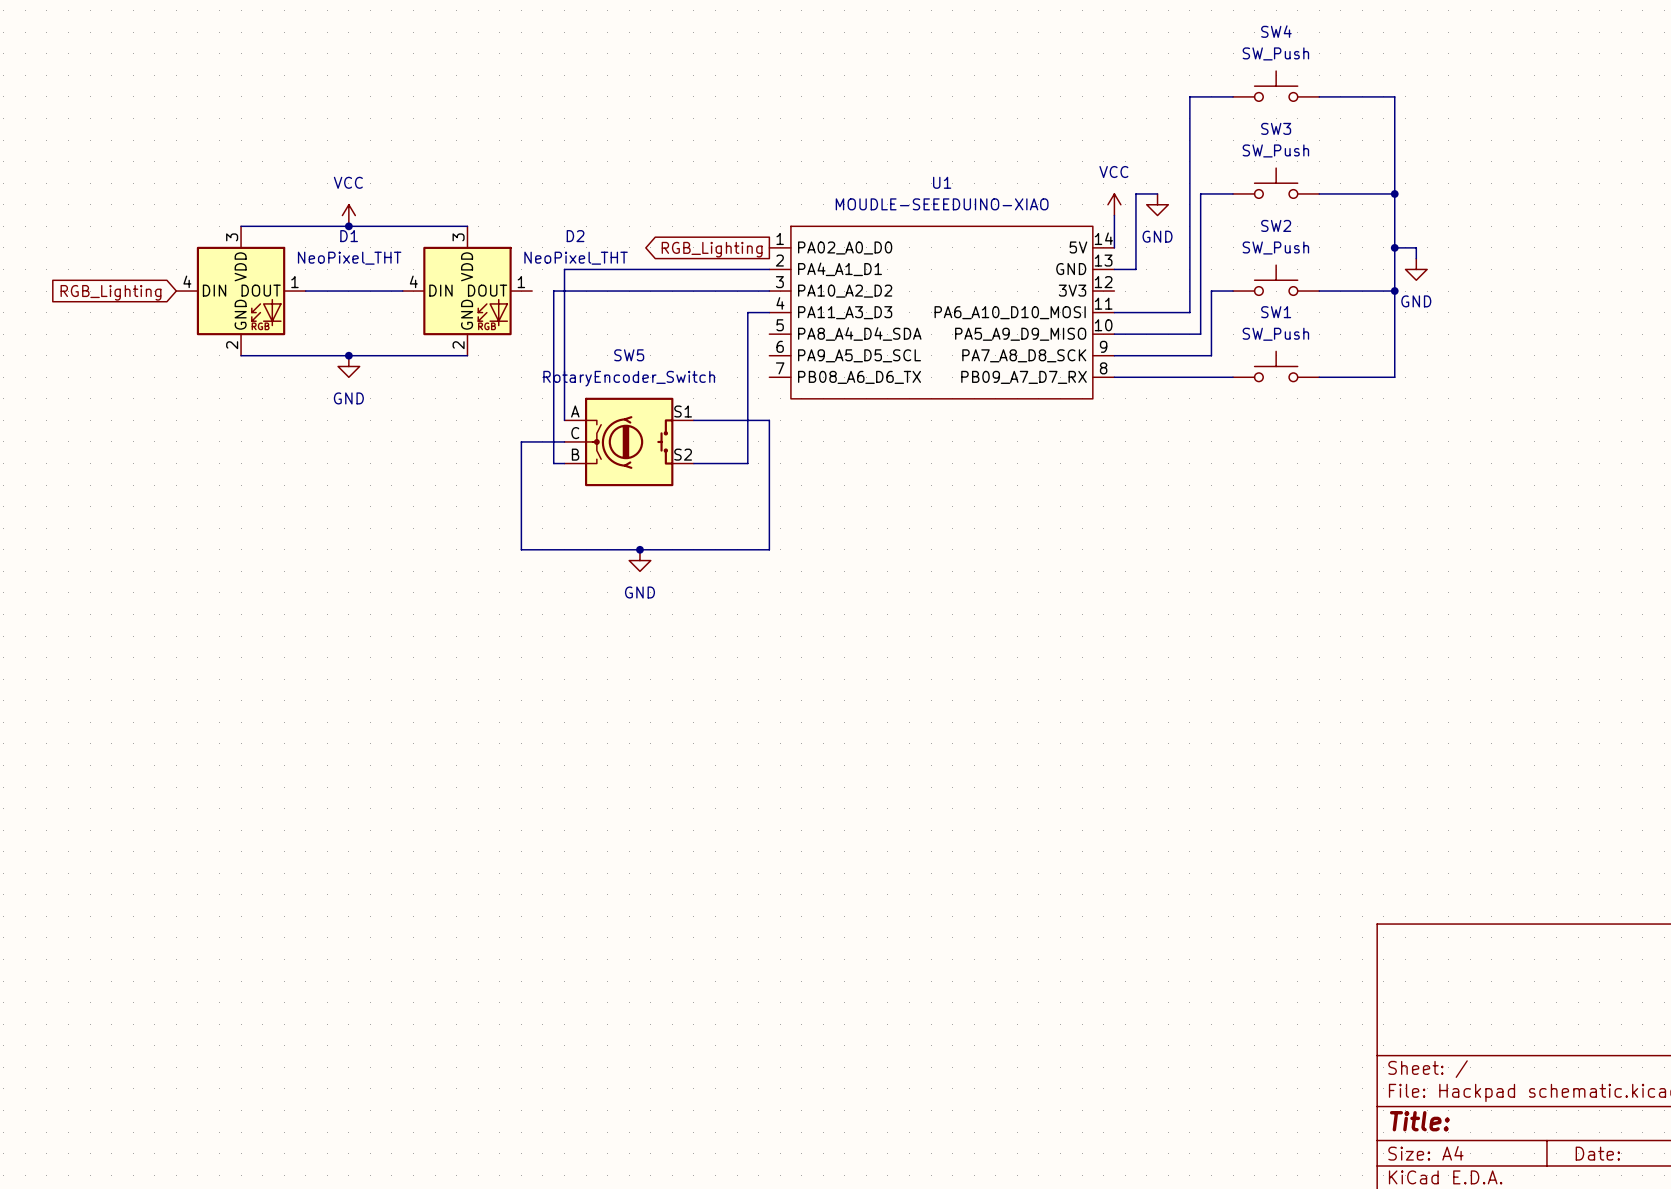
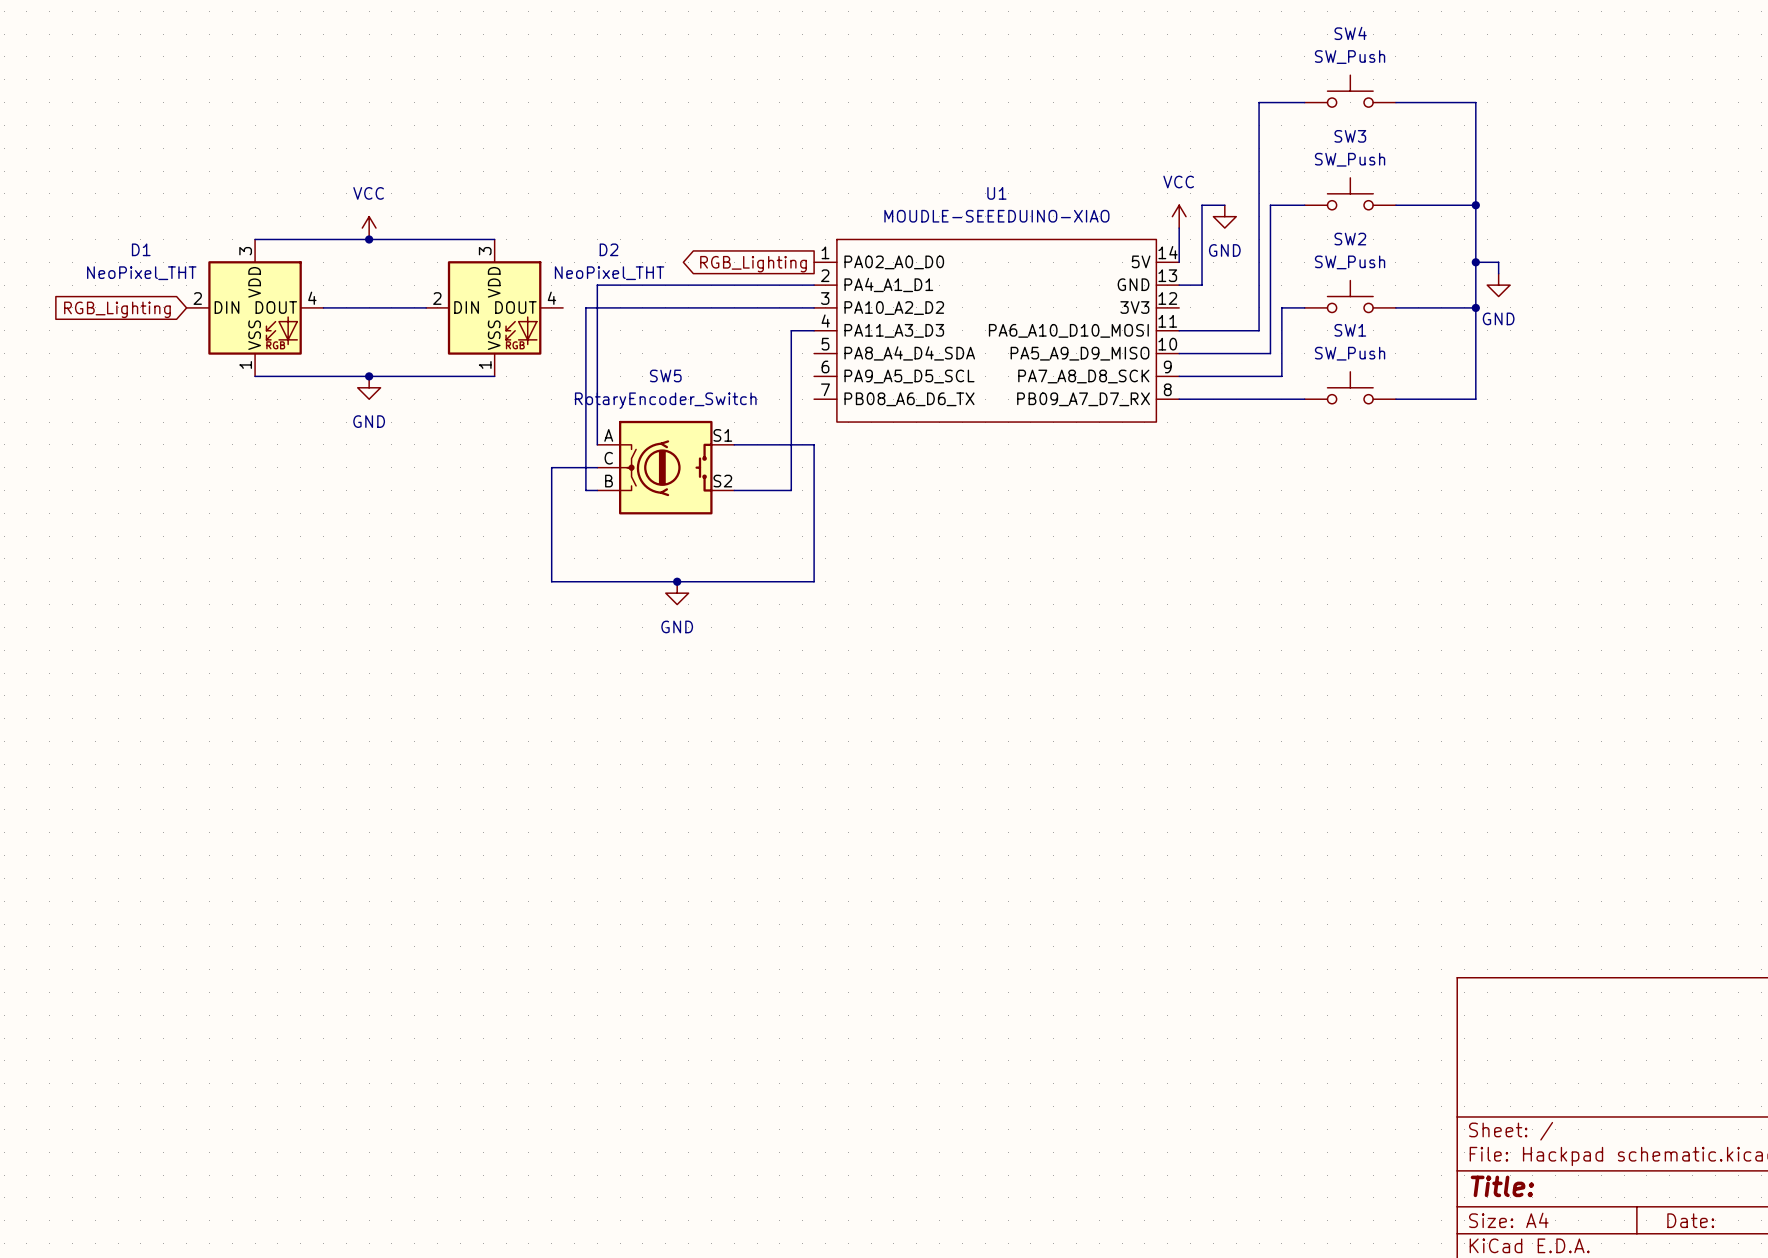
D1 name position: D1 (349, 236) -> D1 (141, 249)
D1 value position: NeoPixel_THT (349, 258) -> NeoPixel_THT (141, 273)
D1 pin number: 4 (187, 281) -> 2 (197, 298)
D2 pin number: 4 (413, 281) -> 2 (437, 298)
D1 pin number: 1 (294, 282) -> 4 (312, 298)
D2 pin number: 1 (521, 282) -> 4 (551, 298)
D1 pin name: GND (240, 314) -> VSS (254, 335)
D2 pin name: GND (467, 314) -> VSS (494, 335)
D1 pin number: 2 (232, 345) -> 1 (245, 364)
D2 pin number: 2 (458, 345) -> 1 (485, 364)

